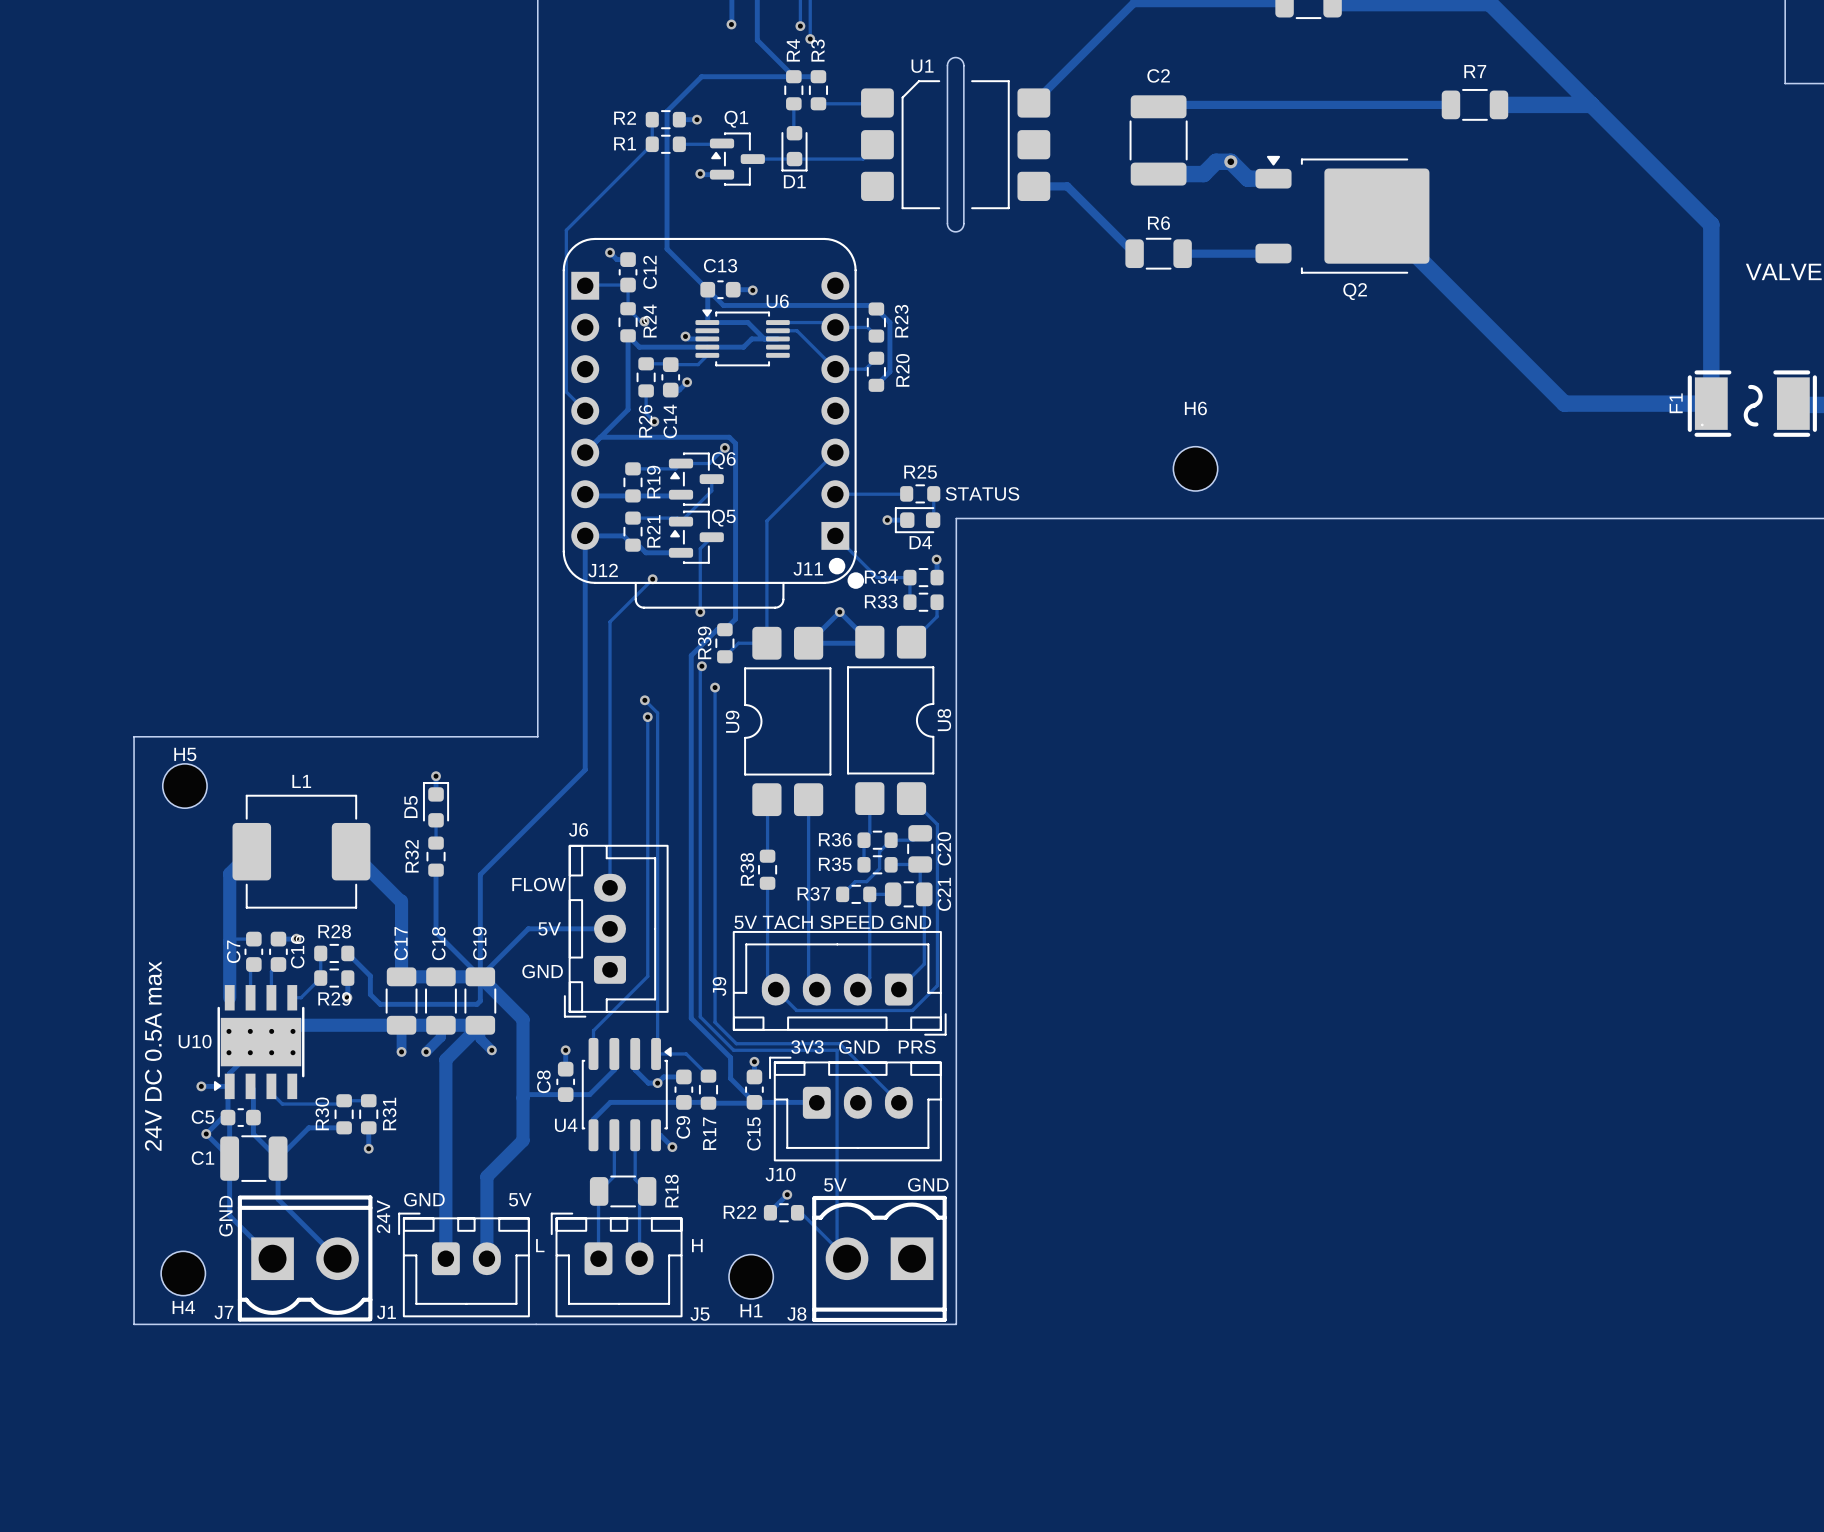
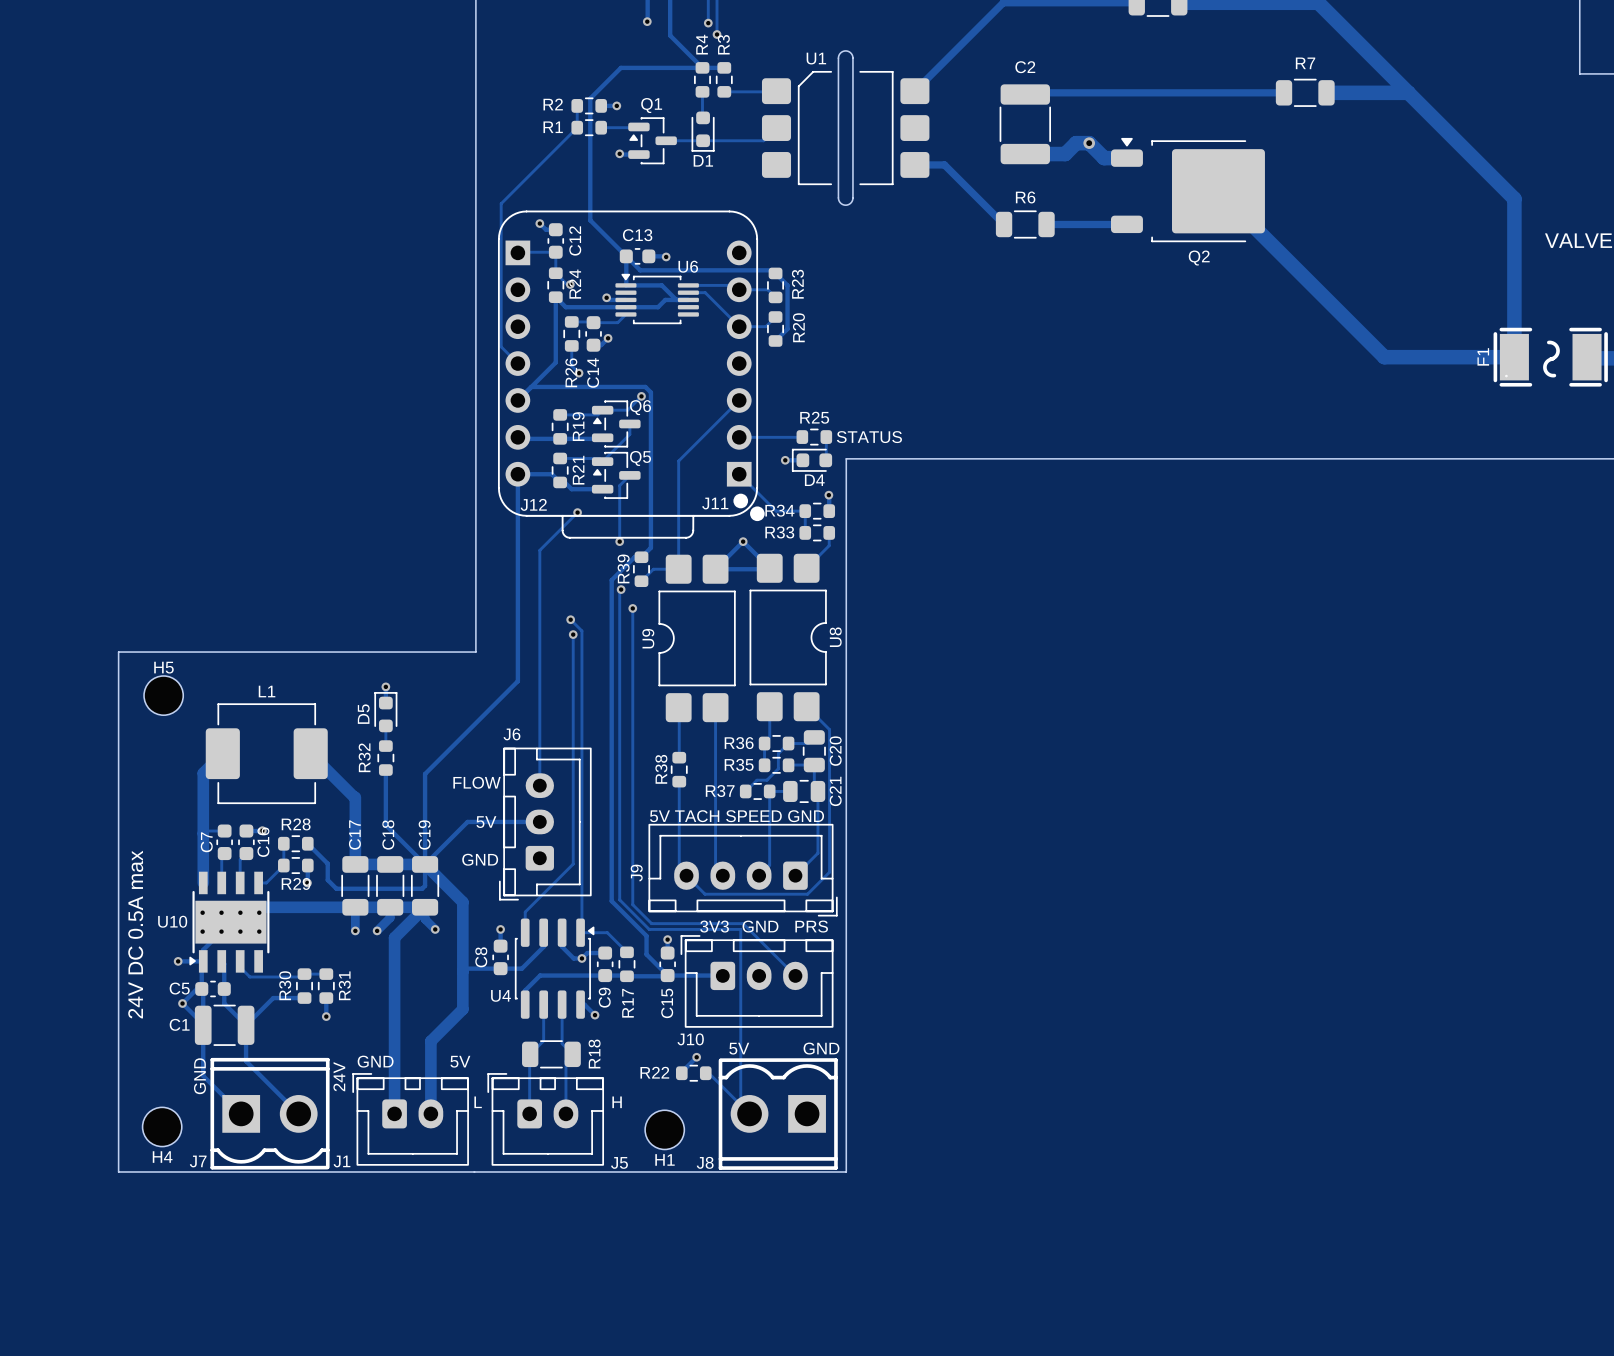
H6: (1195, 468) -> none

